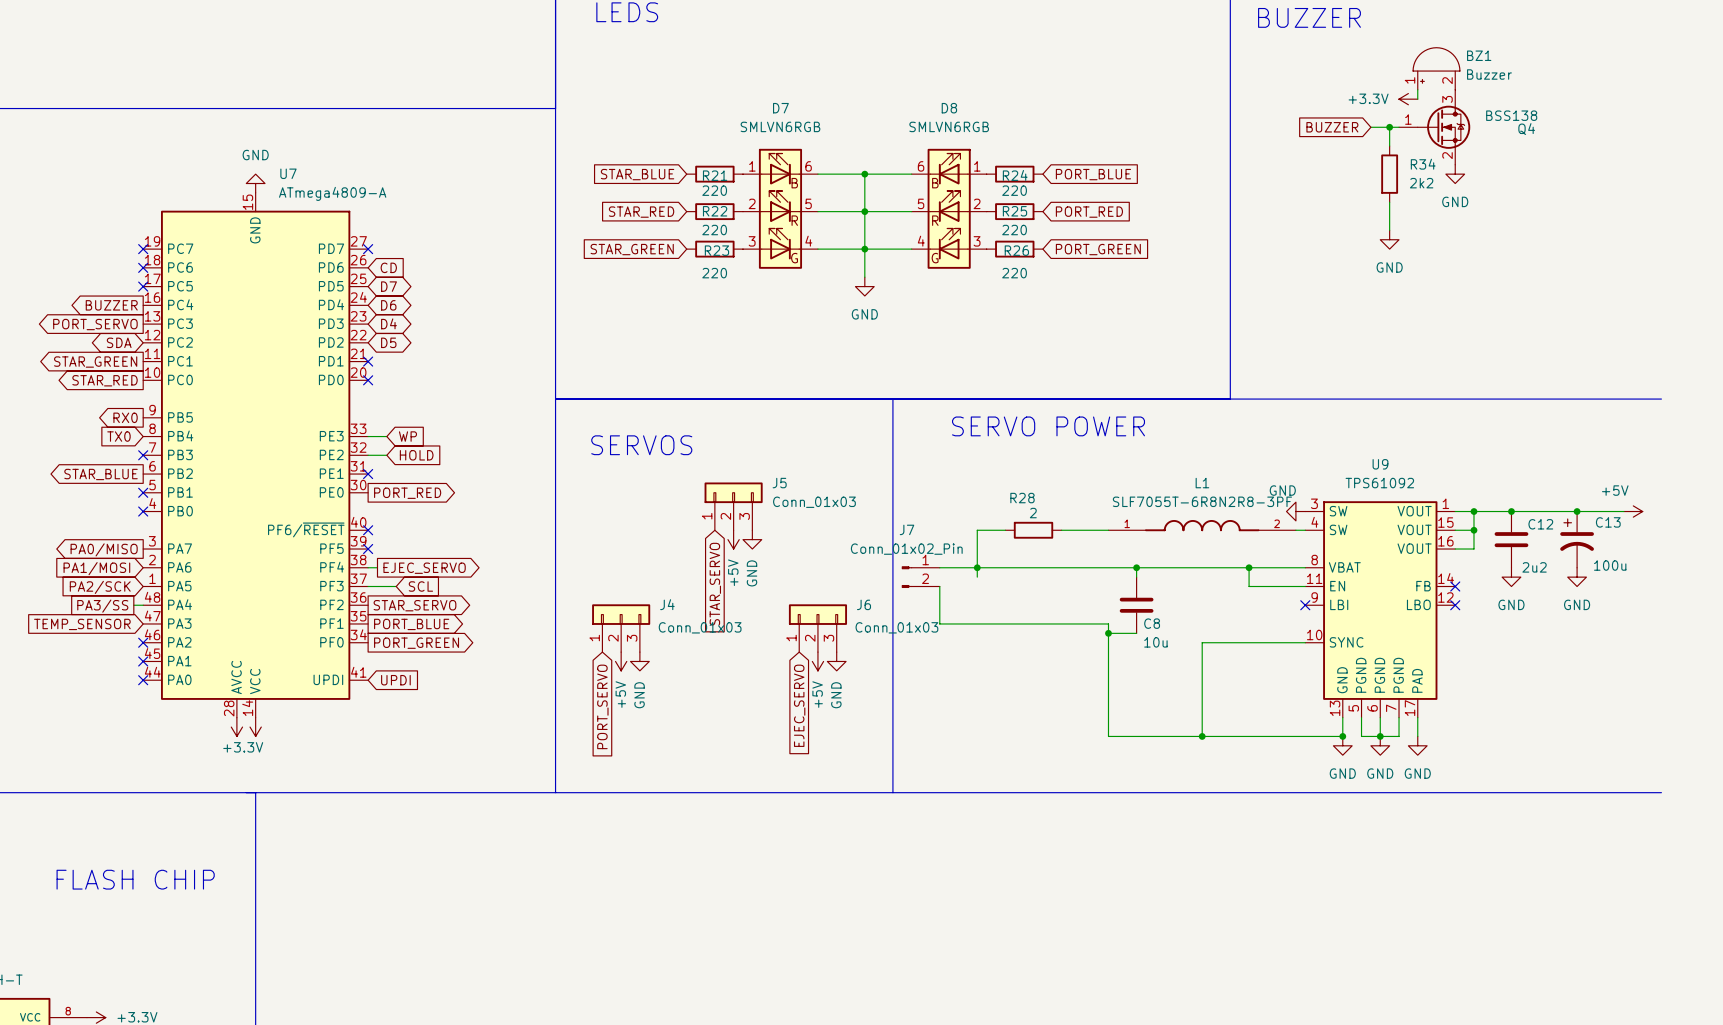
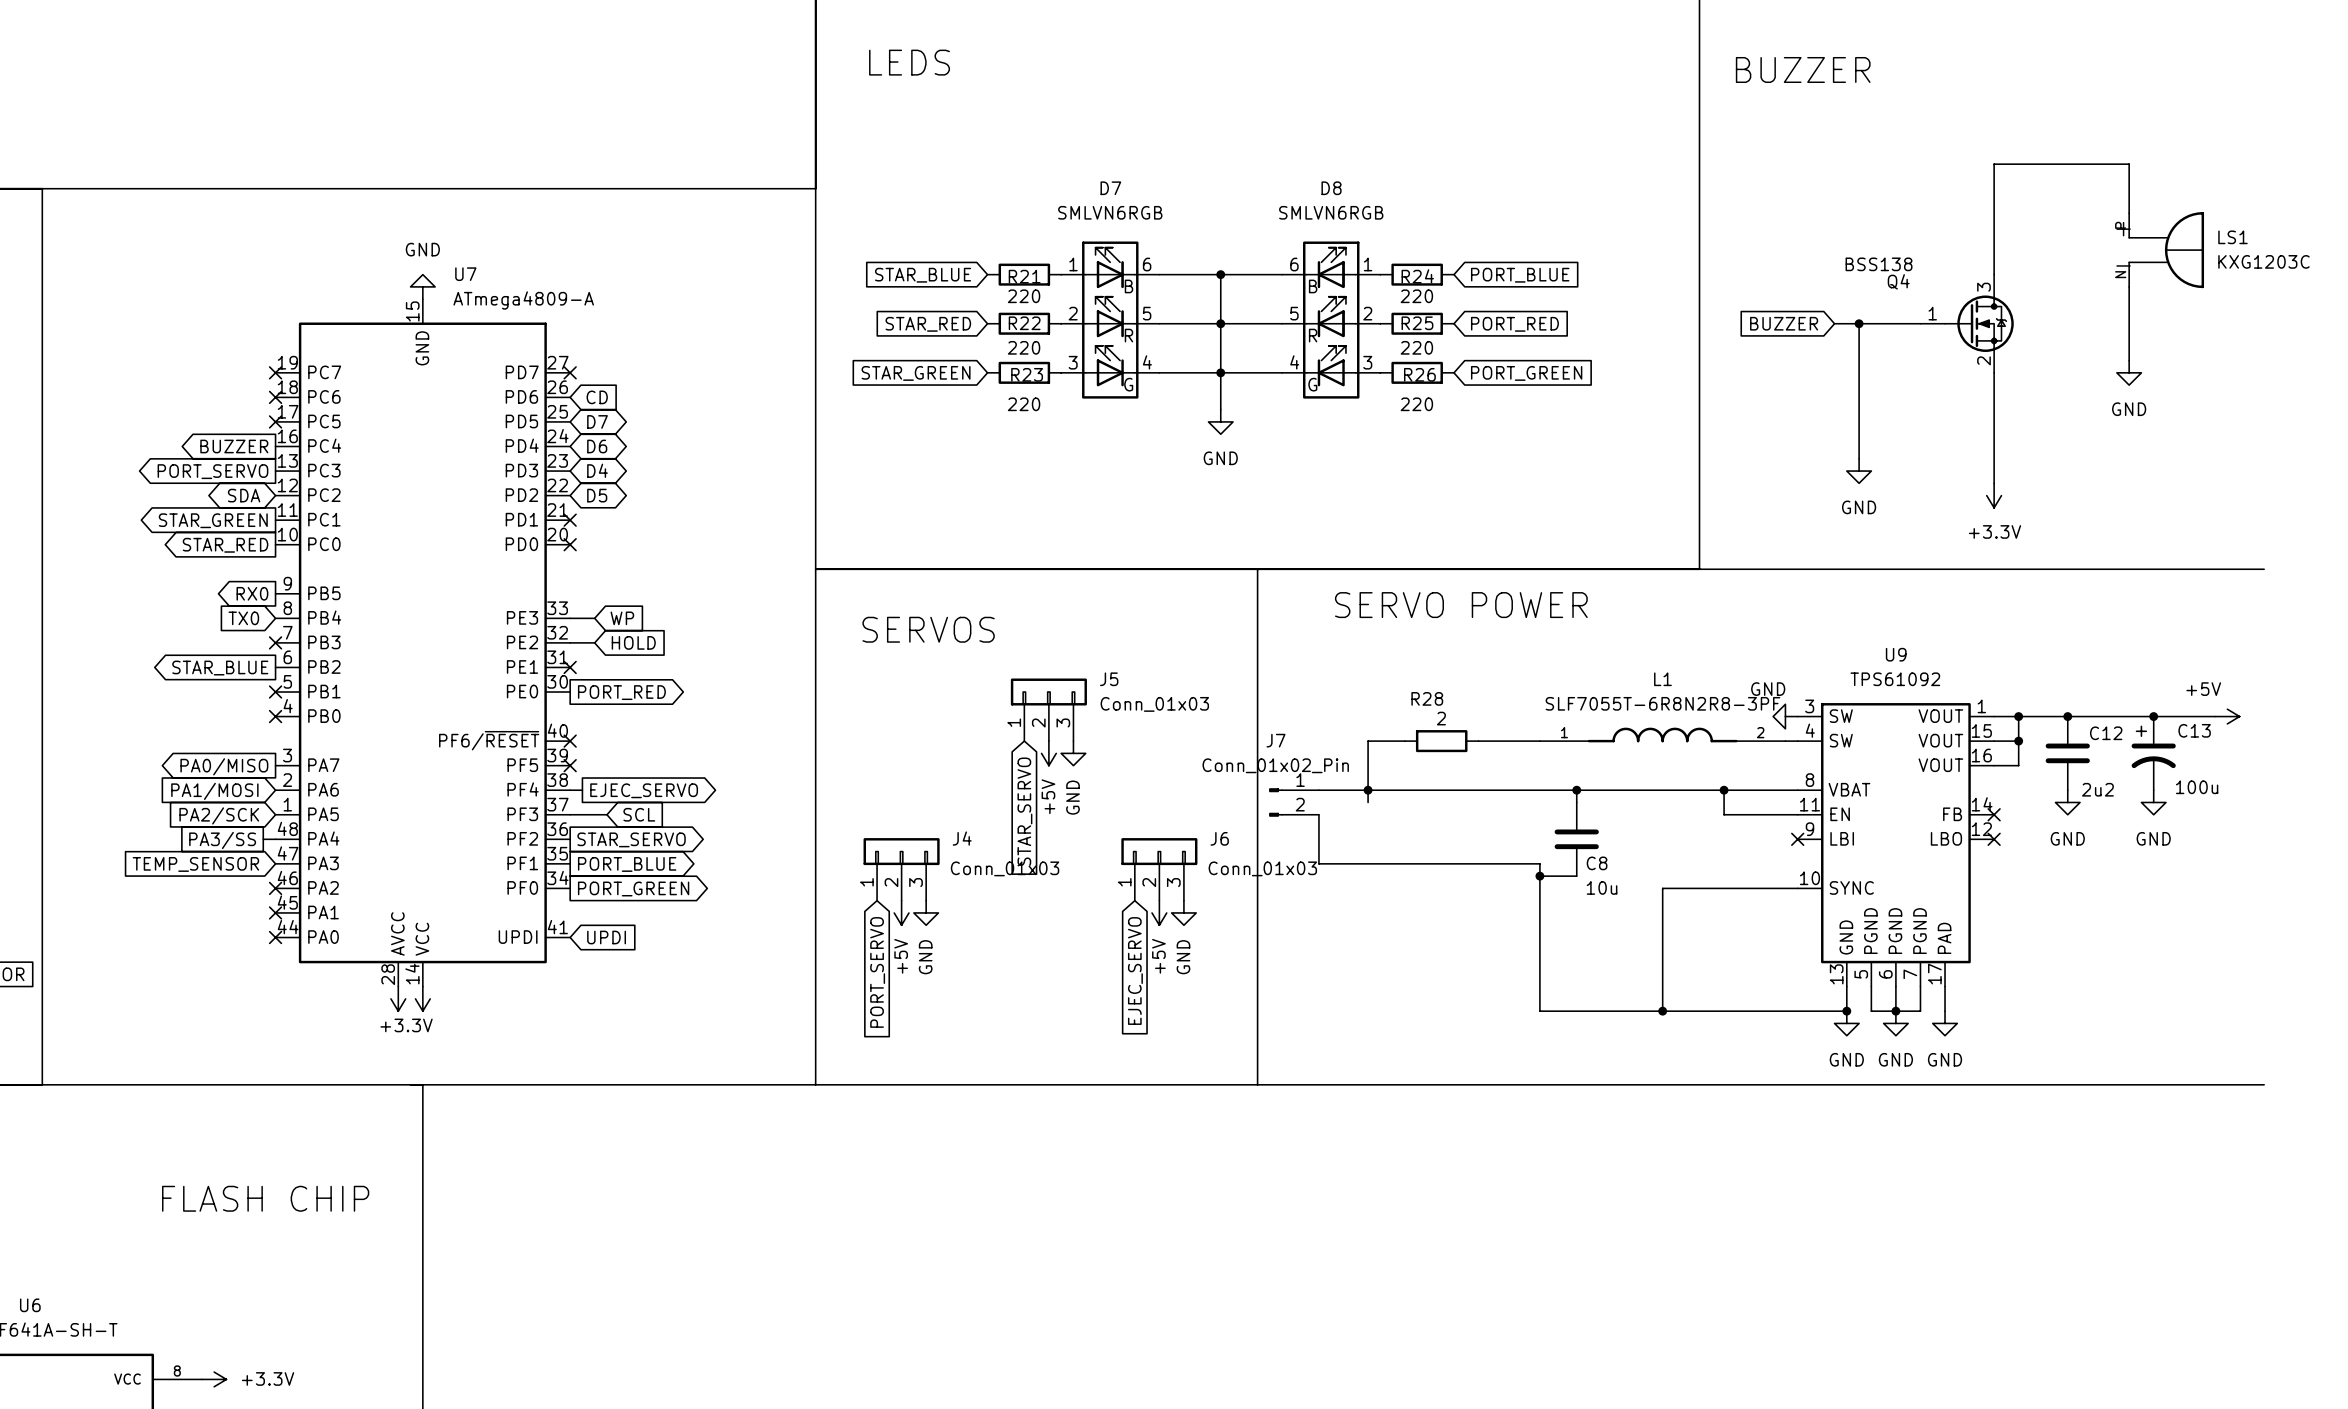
BZ1: Buzzer (1436, 68) -> none
wire: (1417, 89) (1417, 99) -> none
power symbol: +3.3V (1408, 99) -> none
Q4 value position: BSS138 (1511, 115) -> BSS138 (1879, 264)
global label position: BUZZER (1332, 127) -> BUZZER (1784, 323)
wire: (1370, 127) (1399, 127) -> none
wire: (1389, 127) (1389, 146) -> none
junction: (1389, 127) -> none
Q4 position: (1434, 127) -> (1967, 323)
wire: none -> (2129, 213) (2129, 164) (1994, 164) (1994, 274)
Q4 name position: Q4 (1526, 129) -> Q4 (1898, 281)
LS1: none -> KXG1203C (2166, 250)
R34: 2k2 (1389, 174) -> none
power symbol: GND (1455, 174) -> none
wire: none -> (2129, 286) (2129, 360)
wire: (1389, 202) (1389, 230) -> none
wire: none -> (1834, 323) (1920, 323)
wire: none -> (1859, 323) (1859, 458)
junction: none -> (1859, 323)
power symbol: GND (1389, 239) -> none
wire: none -> (1994, 372) (1994, 483)
power symbol: none -> GND (2129, 372)
power symbol: none -> GND (1859, 471)
power symbol: none -> +3.3V (1994, 495)

